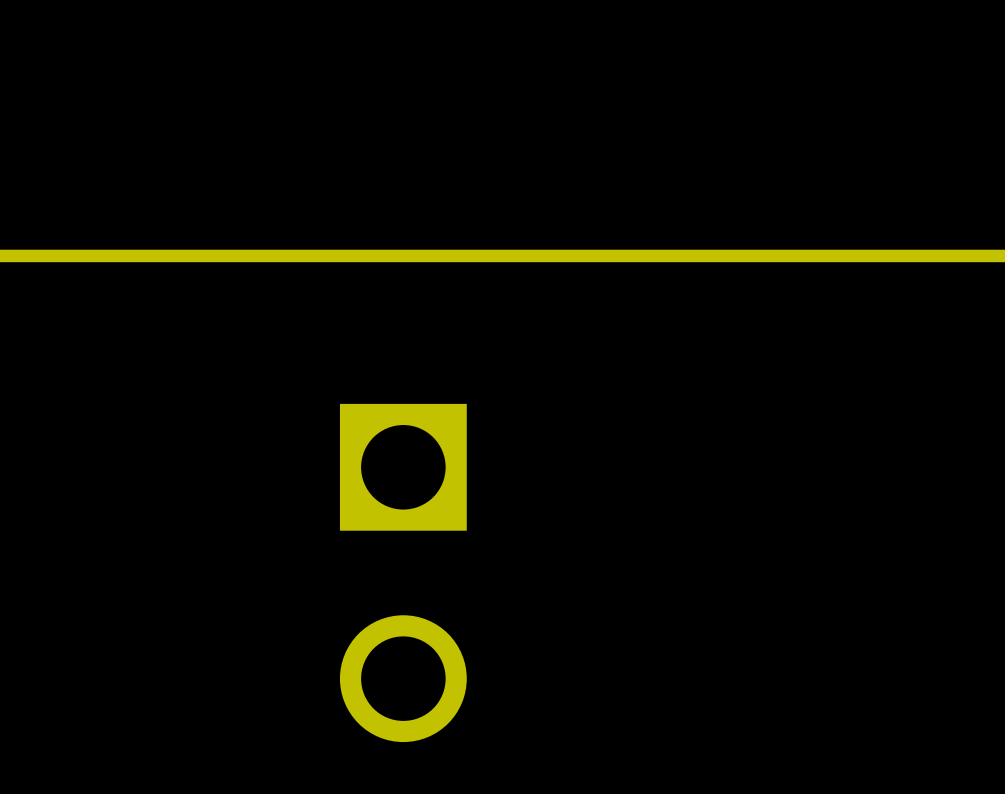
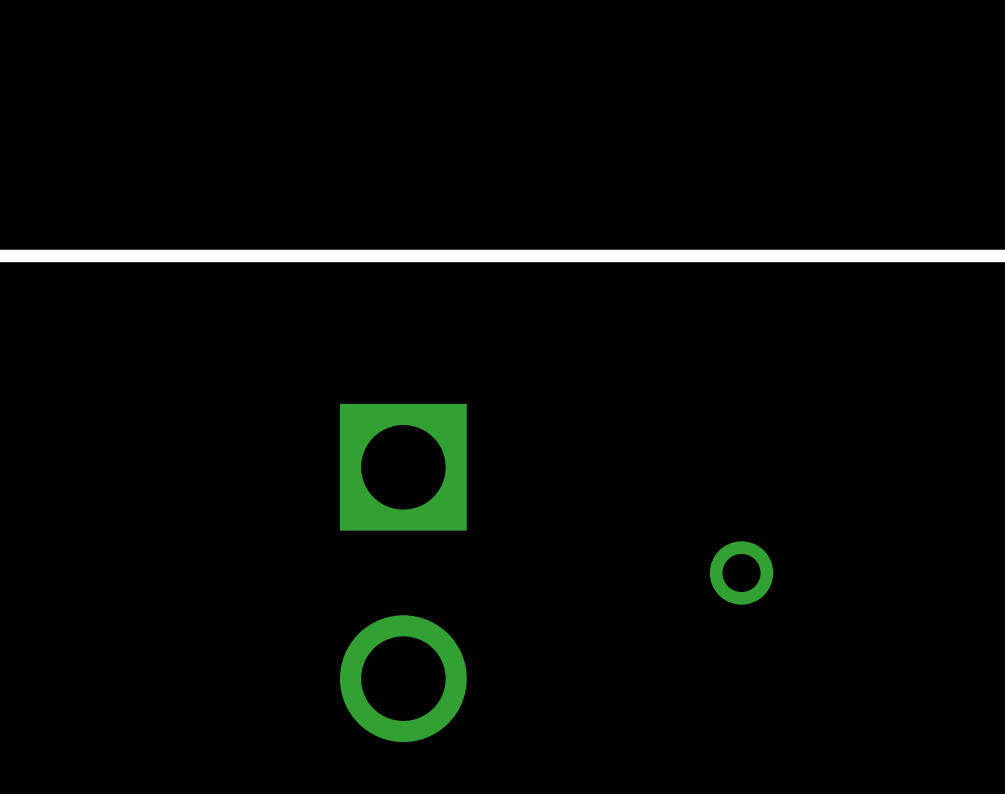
via: none -> (741, 572)

